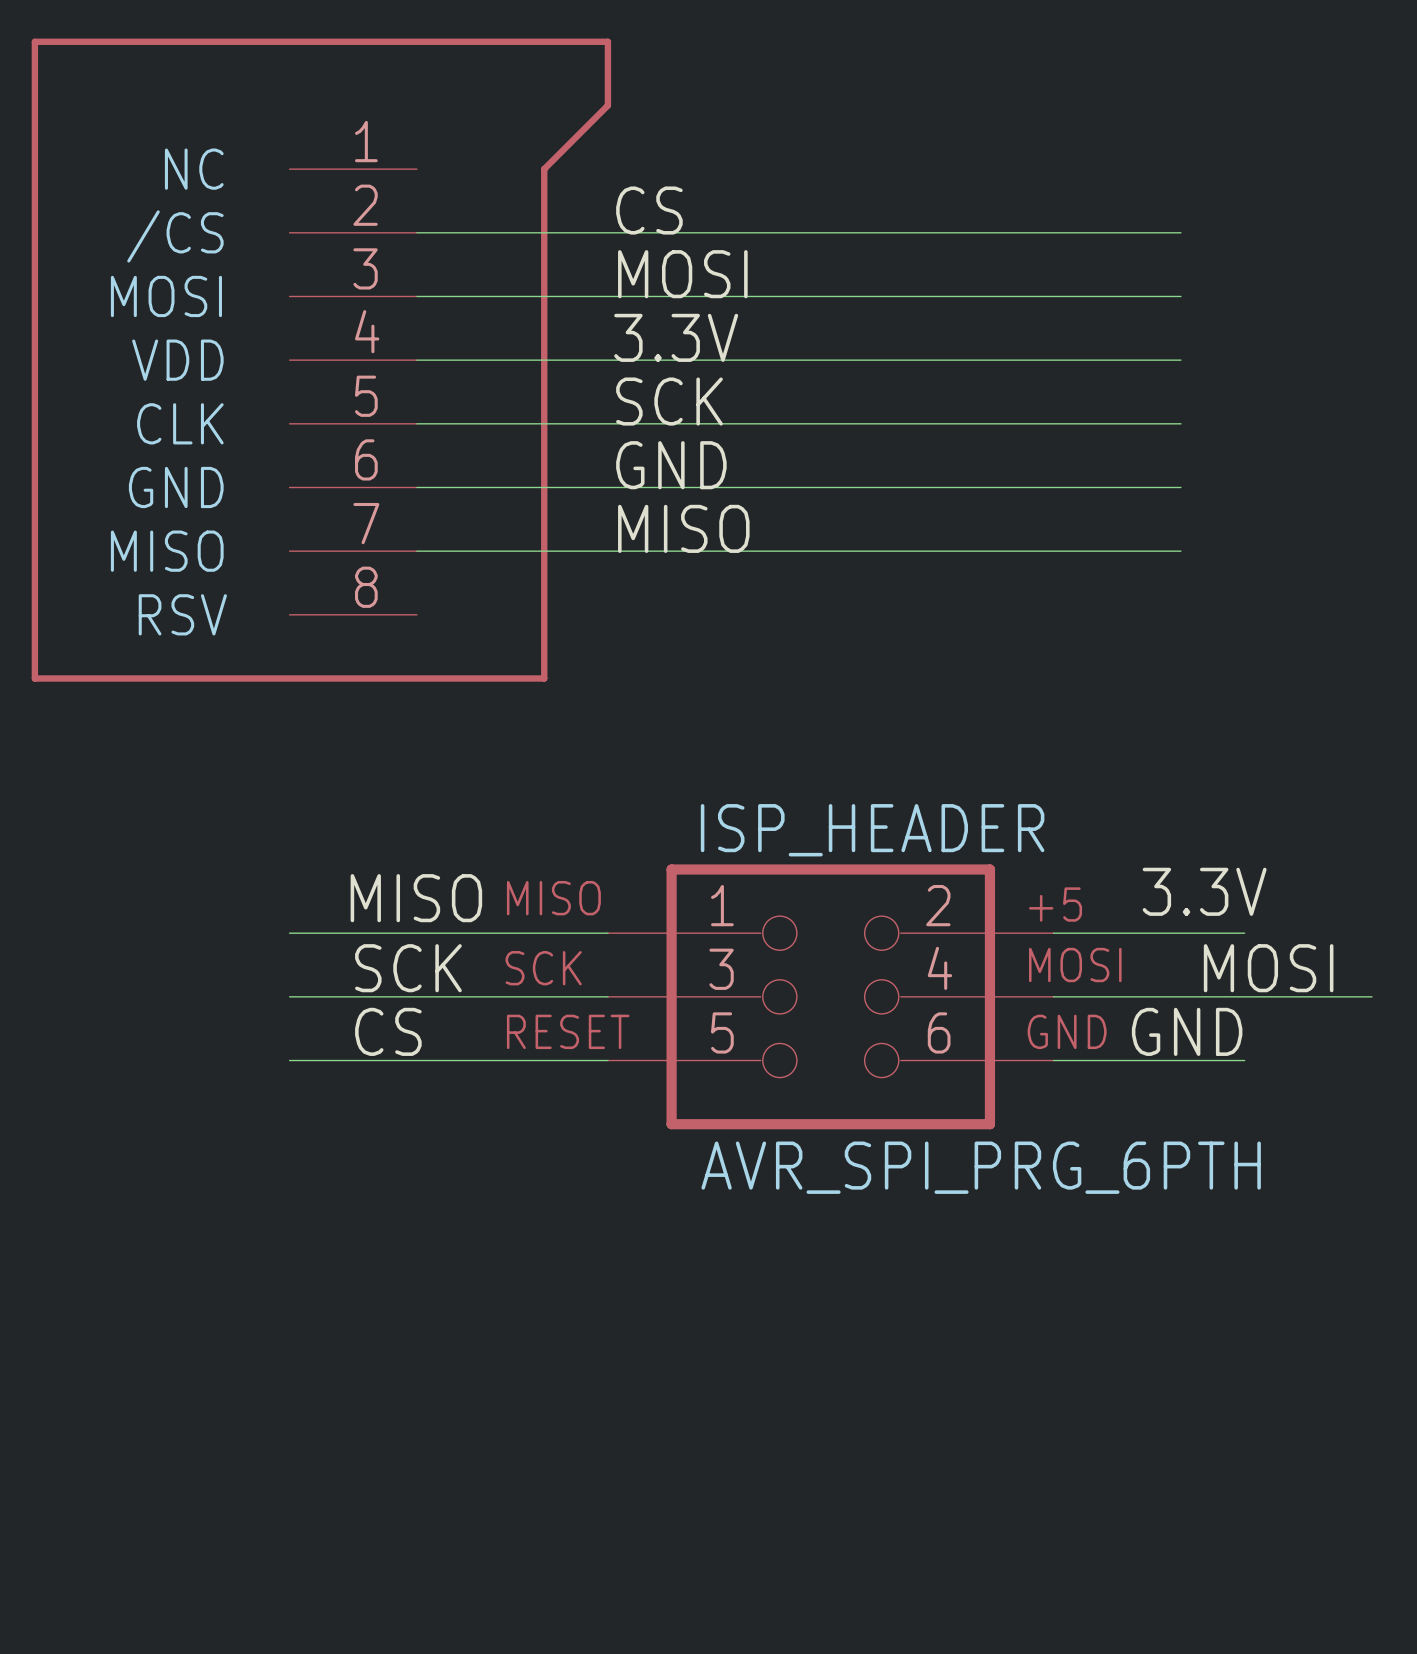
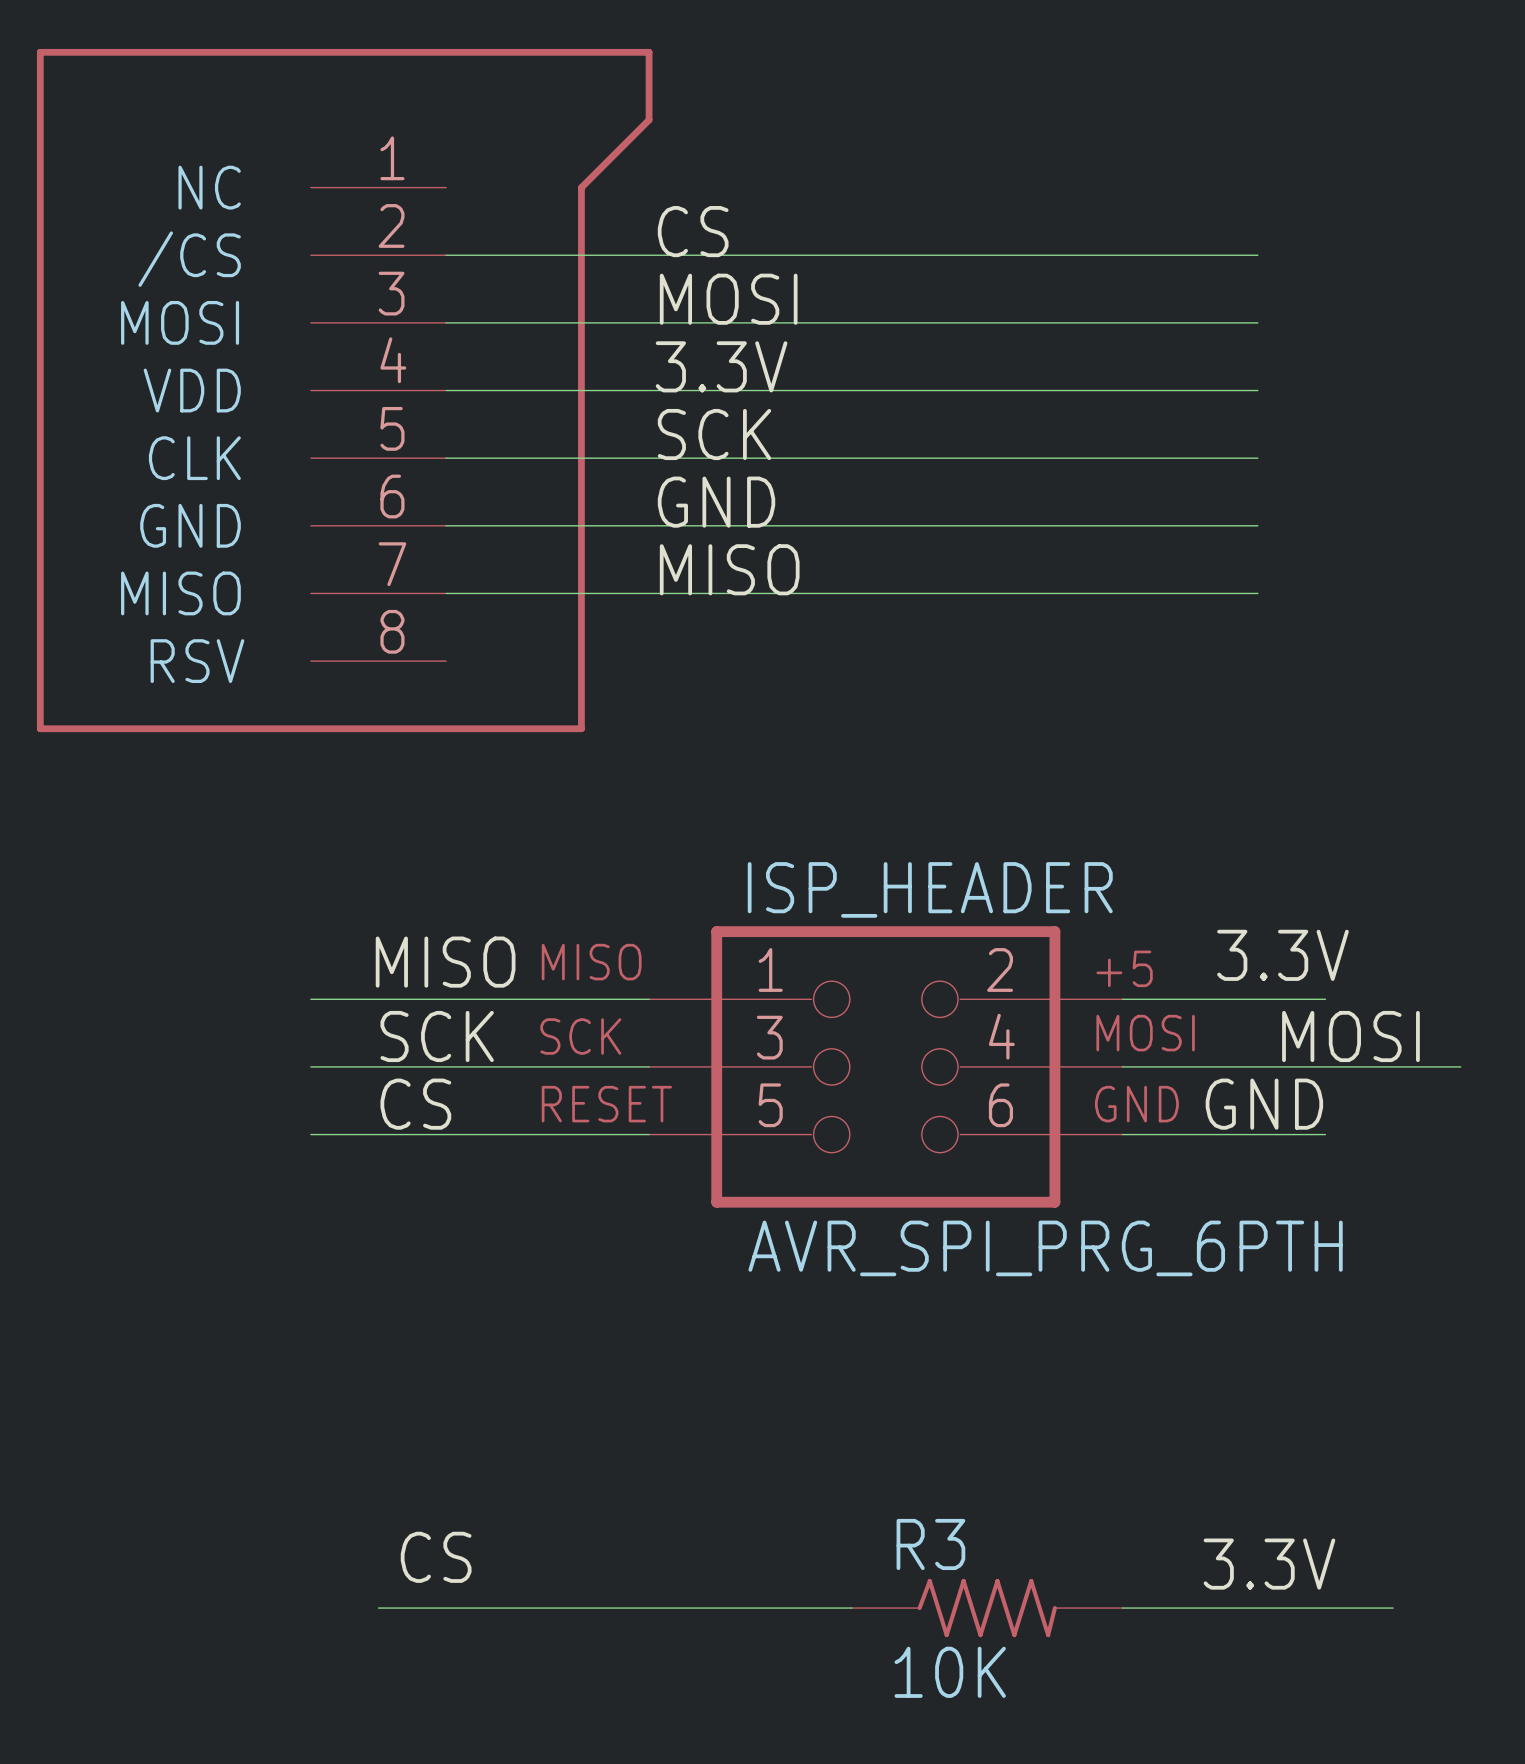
label: none -> CS (436, 1557)
label: none -> 3.3V (1269, 1564)
wire: none -> (378, 1608) (852, 1608)
R3: none -> 10K (987, 1608)
wire: none -> (1122, 1608) (1393, 1608)

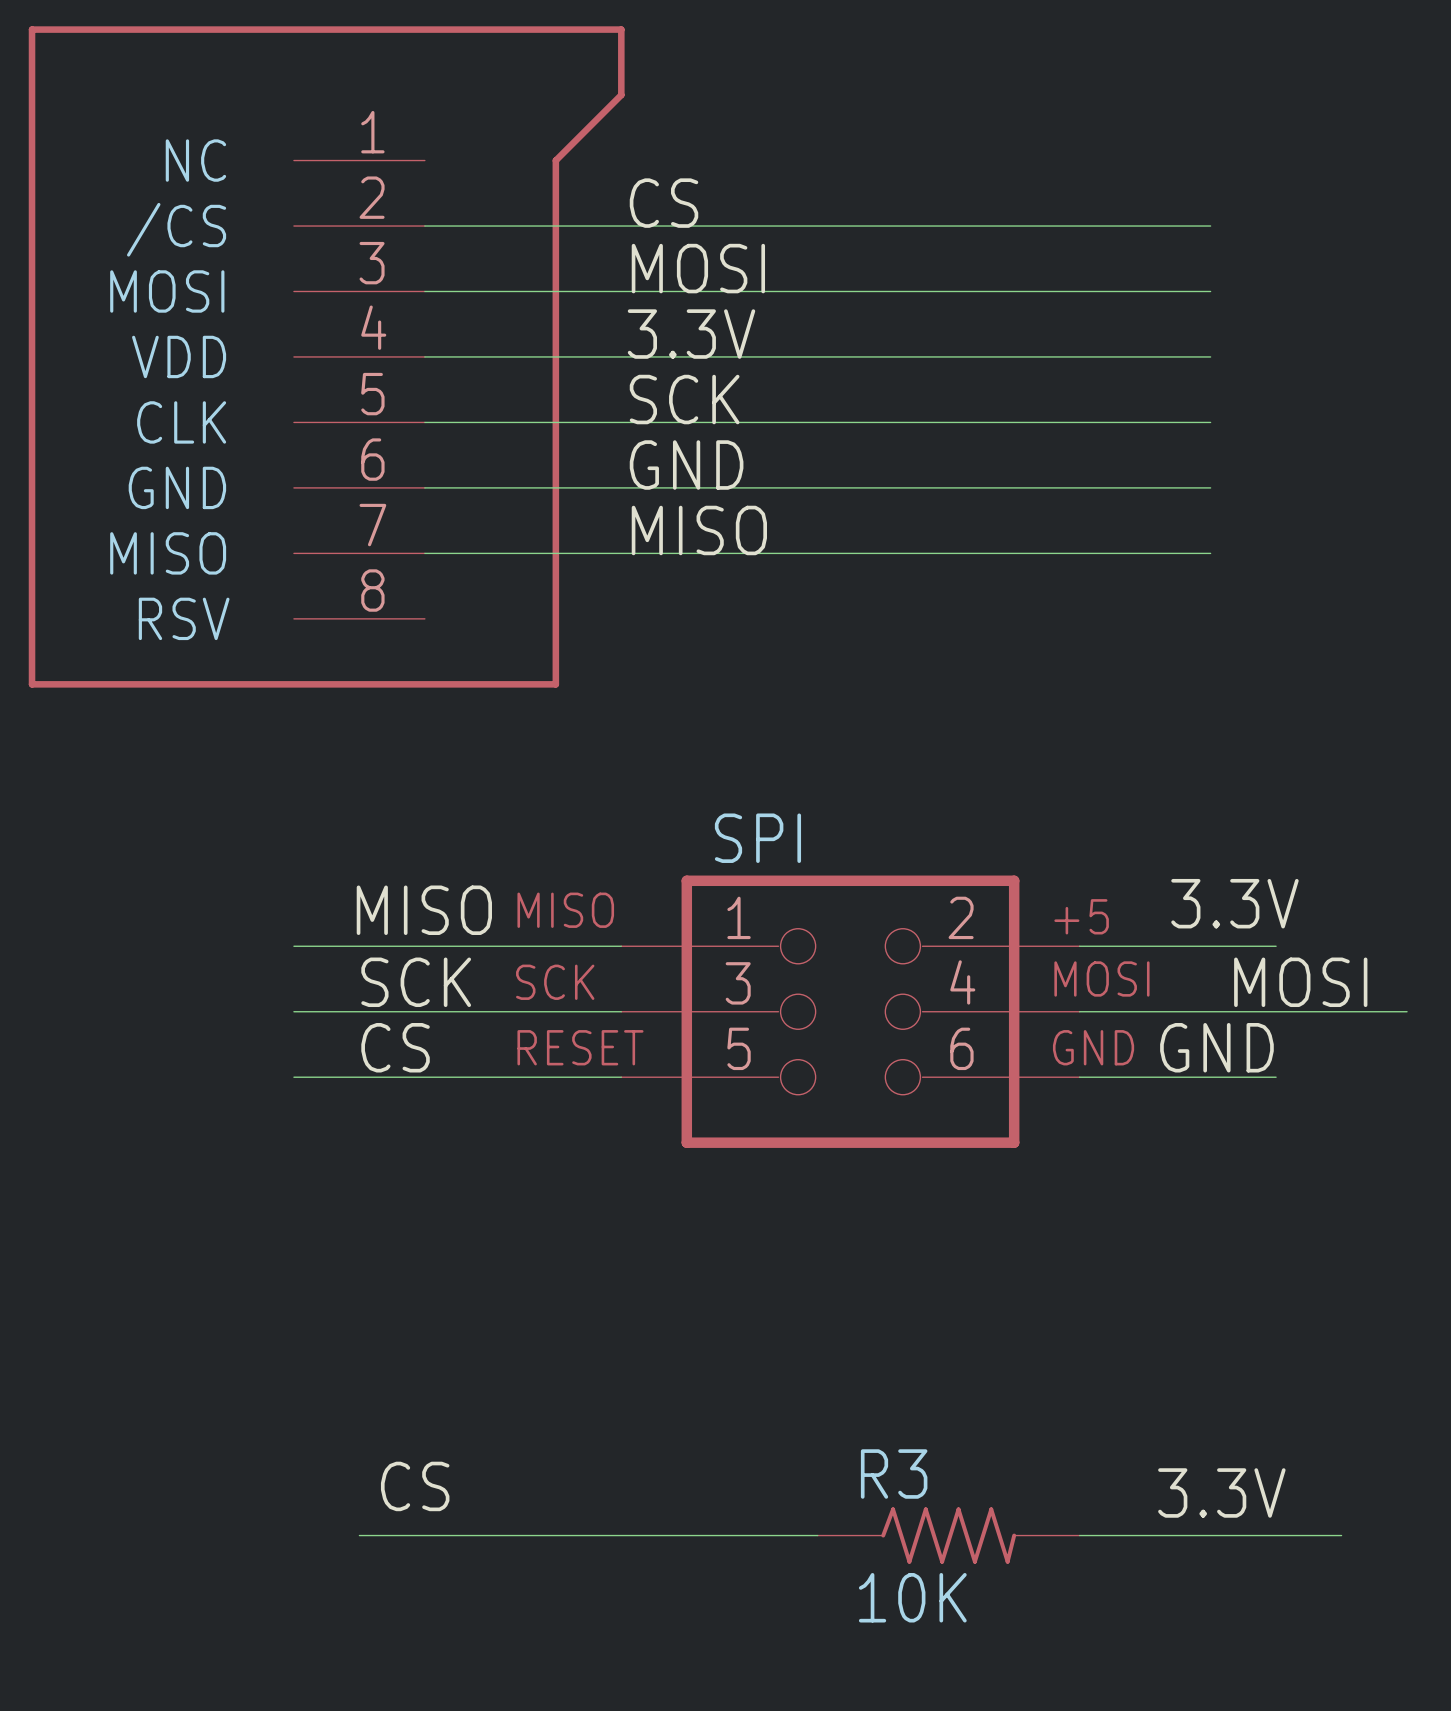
ISP_HEADER name: ISP_HEADER (930, 889) -> SPI (757, 838)
ISP_HEADER value: AVR_SPI_PRG_6PTH (1045, 1248) -> none

